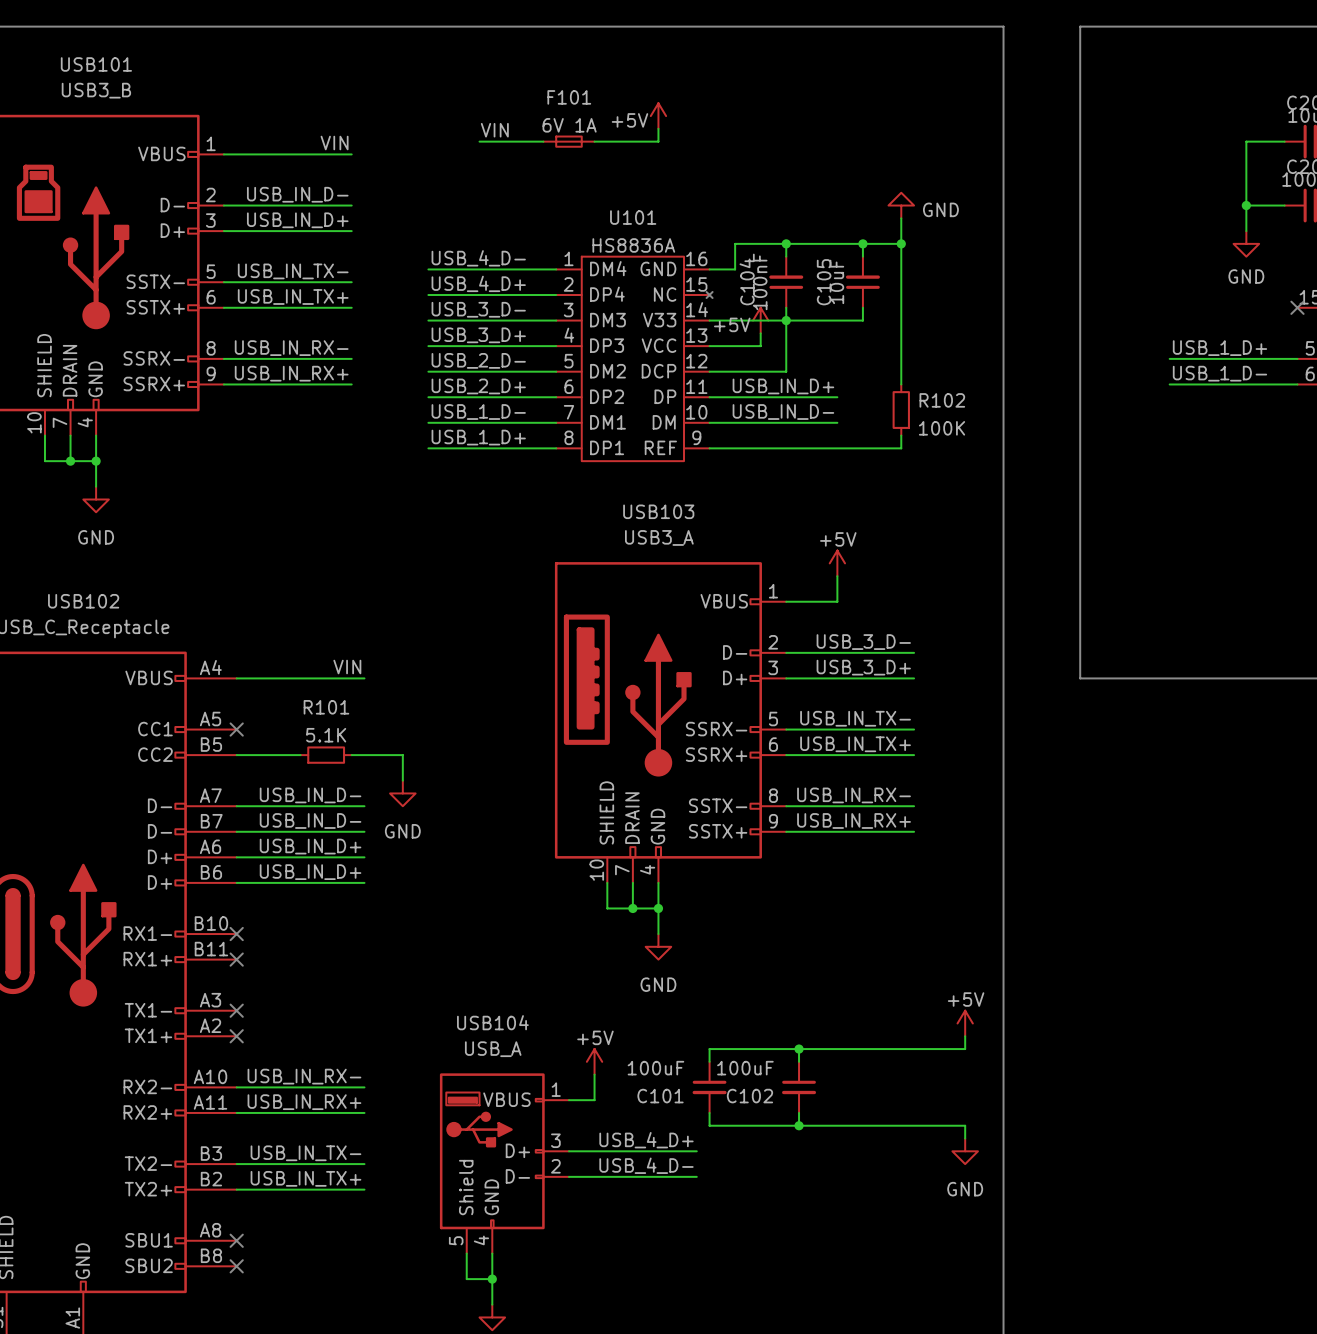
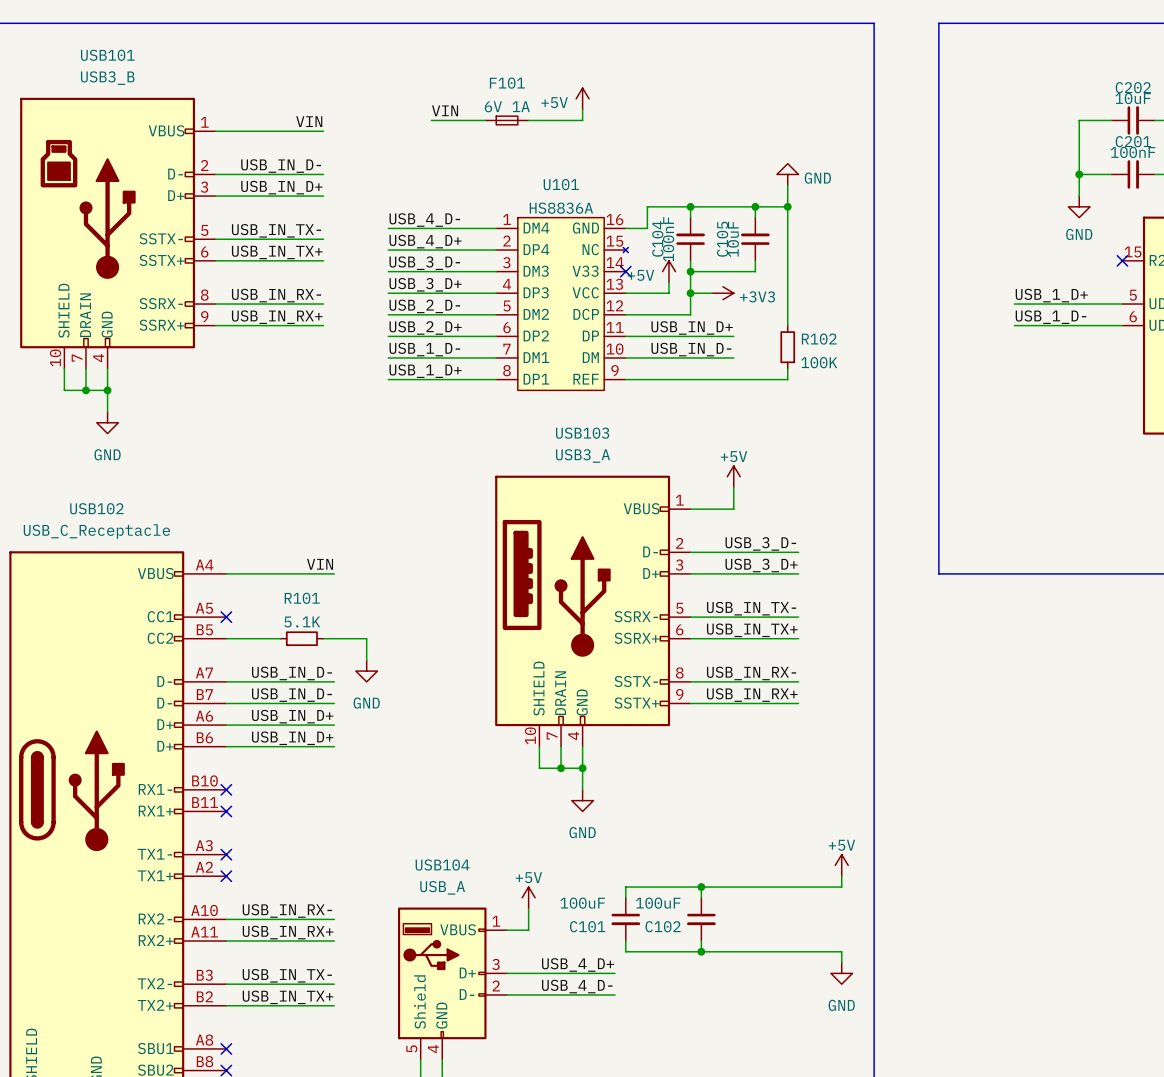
wire: (709, 320) (786, 320) -> none
no-connect mark: none -> (625, 271)
wire: none -> (690, 293) (712, 293)
junction: none -> (690, 293)
power symbol: none -> +3V3 (722, 293)

